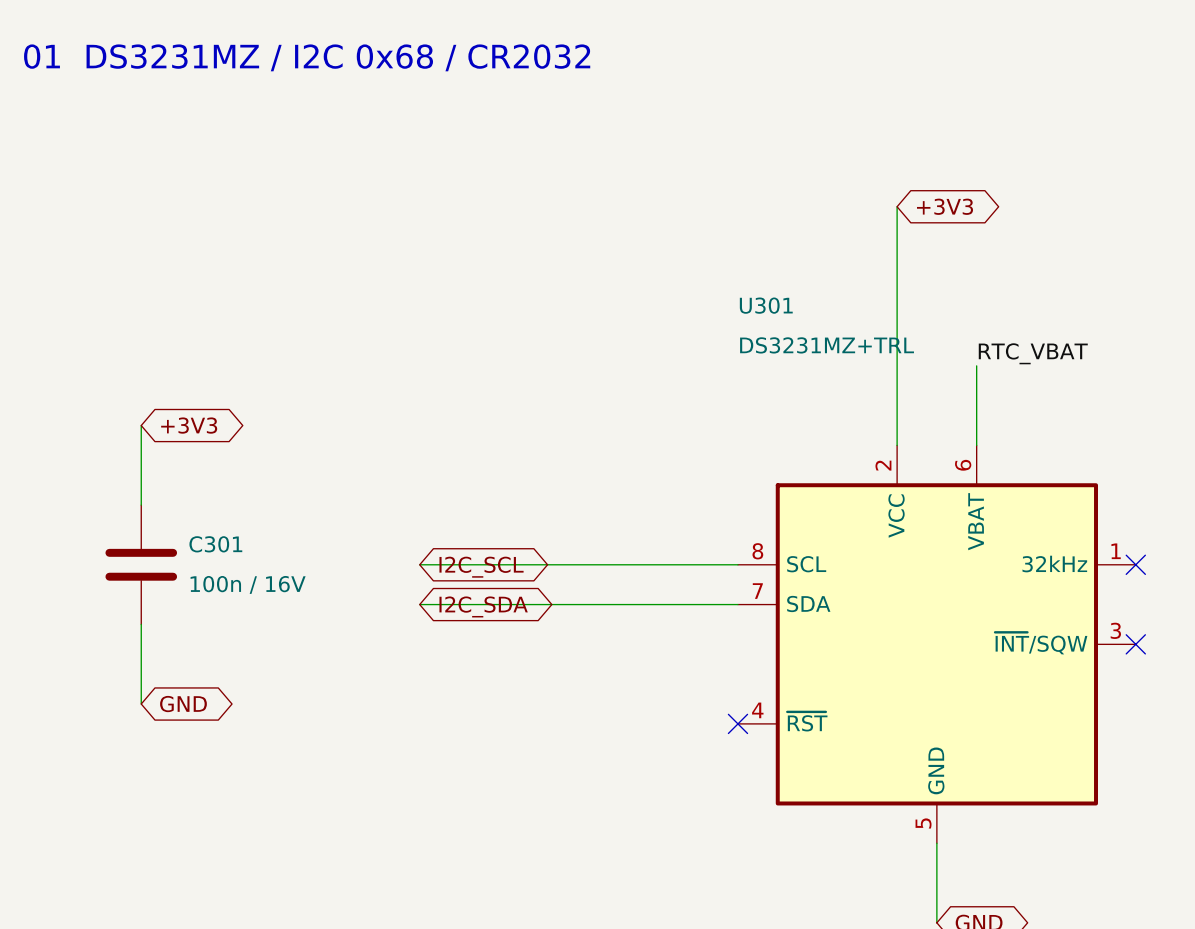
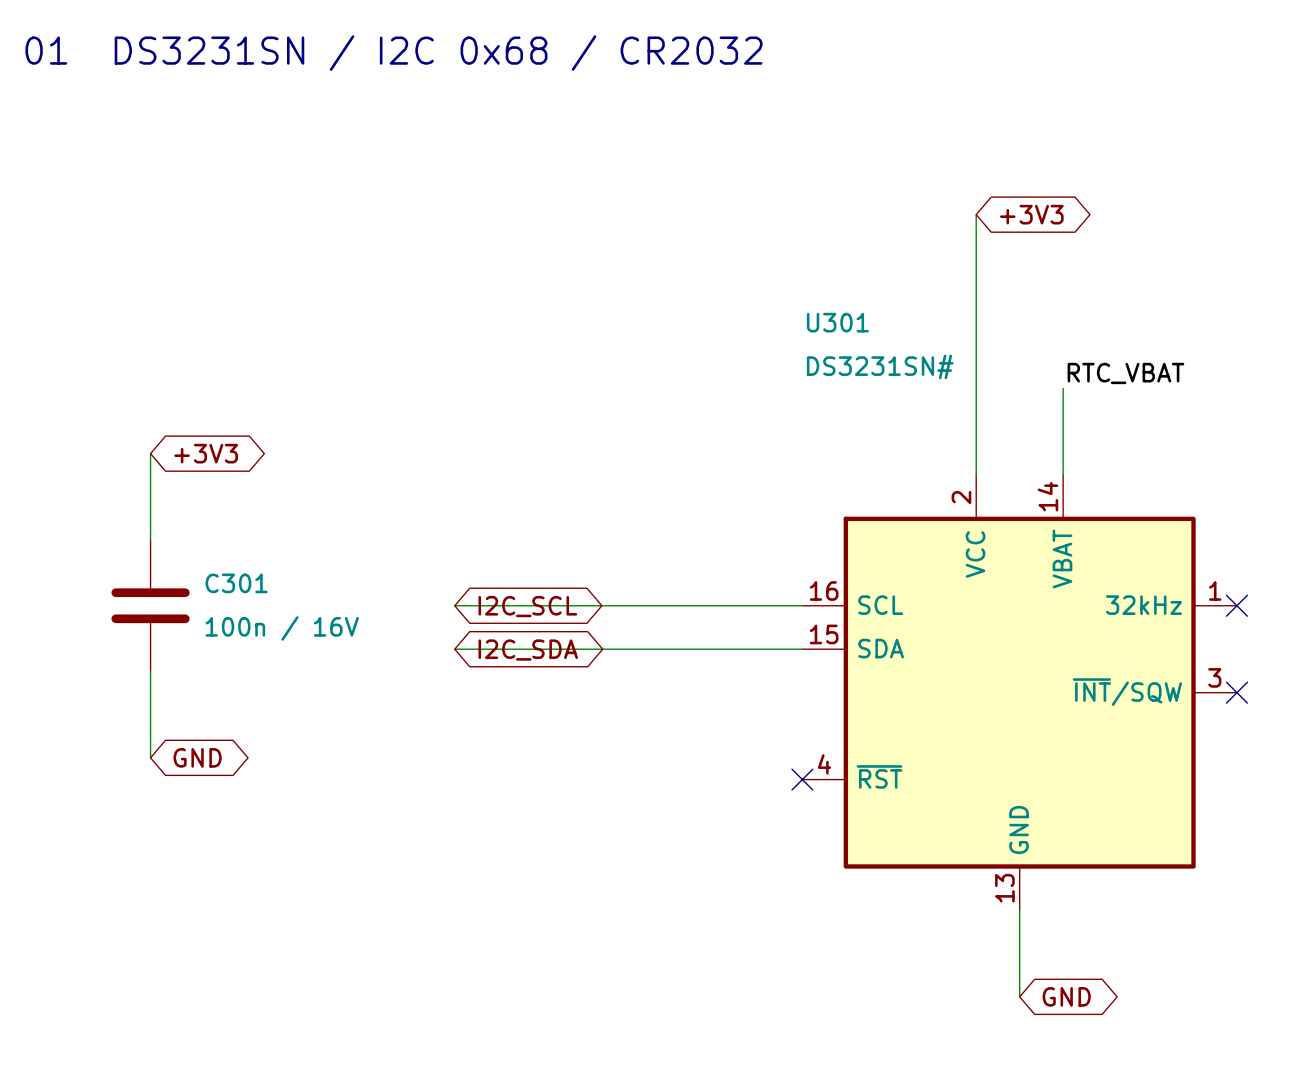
text: 01 DS3231MZ / I2C 0x68 / CR2032 (307, 57) -> 01 DS3231SN / I2C 0x68 / CR2032 (394, 53)
U301 value: DS3231MZ+TRL (827, 345) -> DS3231SN# (880, 366)
U301 pin number: 6 (963, 465) -> 14 (1047, 496)
U301 pin number: 8 (757, 551) -> 16 (824, 590)
U301 pin number: 7 (757, 591) -> 15 (824, 634)
U301 pin number: 5 (923, 823) -> 13 (1004, 888)

